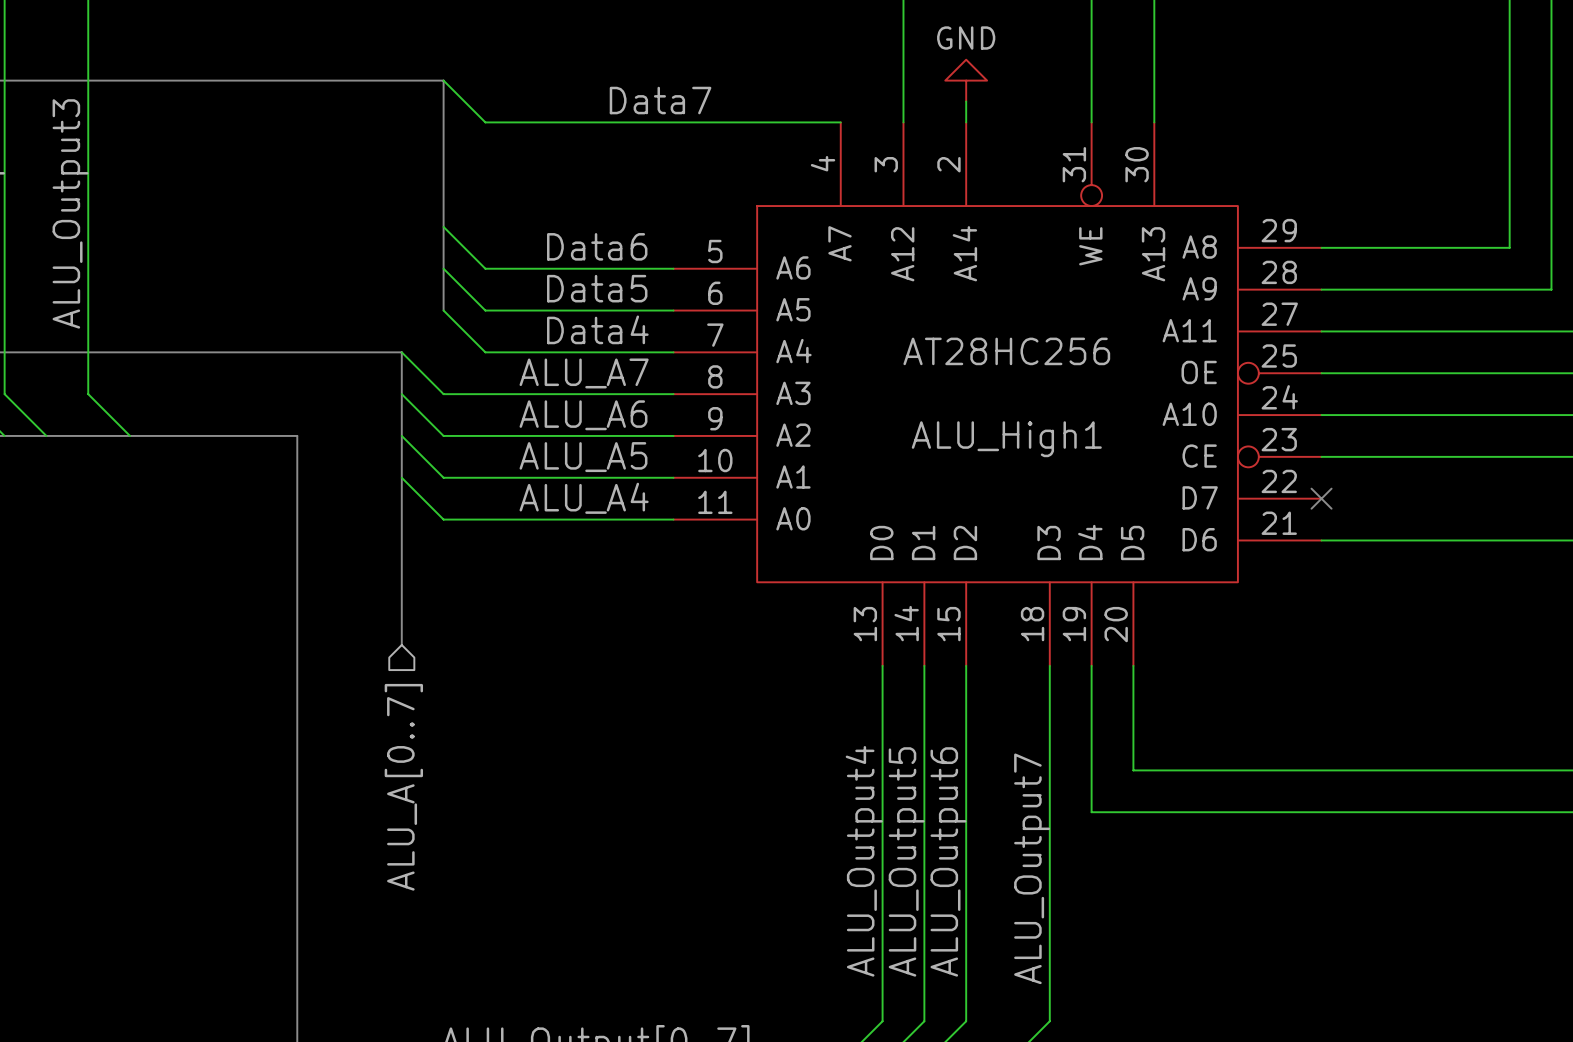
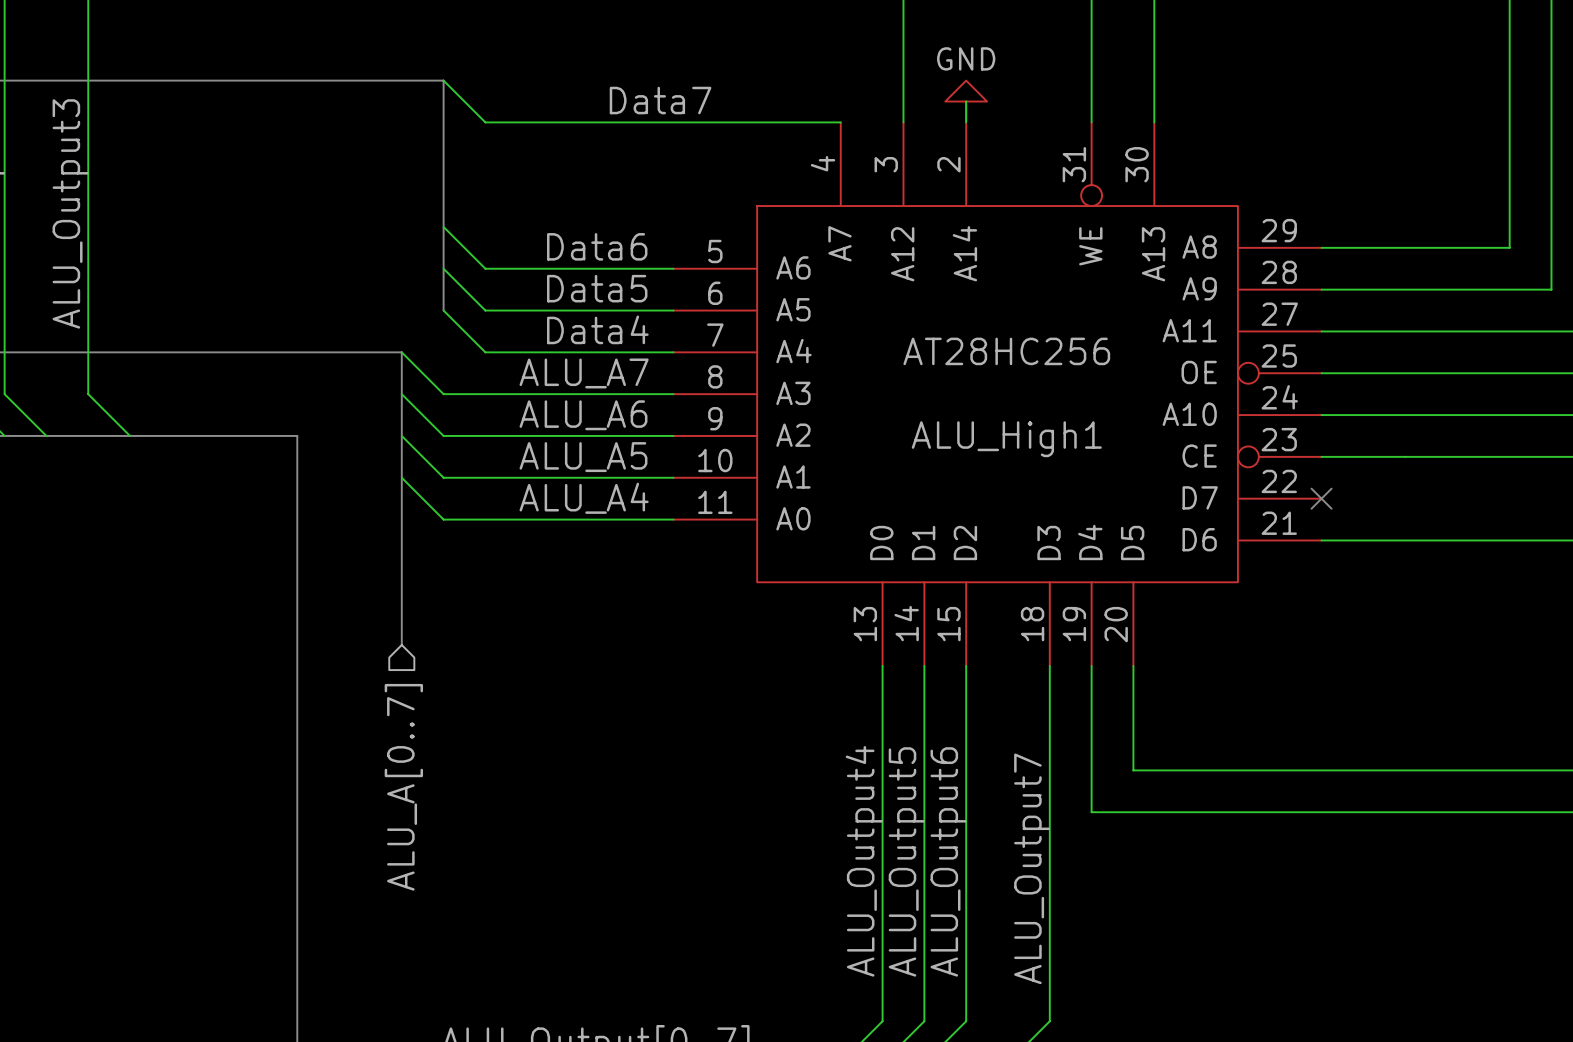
power symbol position: GND (966, 80) -> GND (966, 101)

